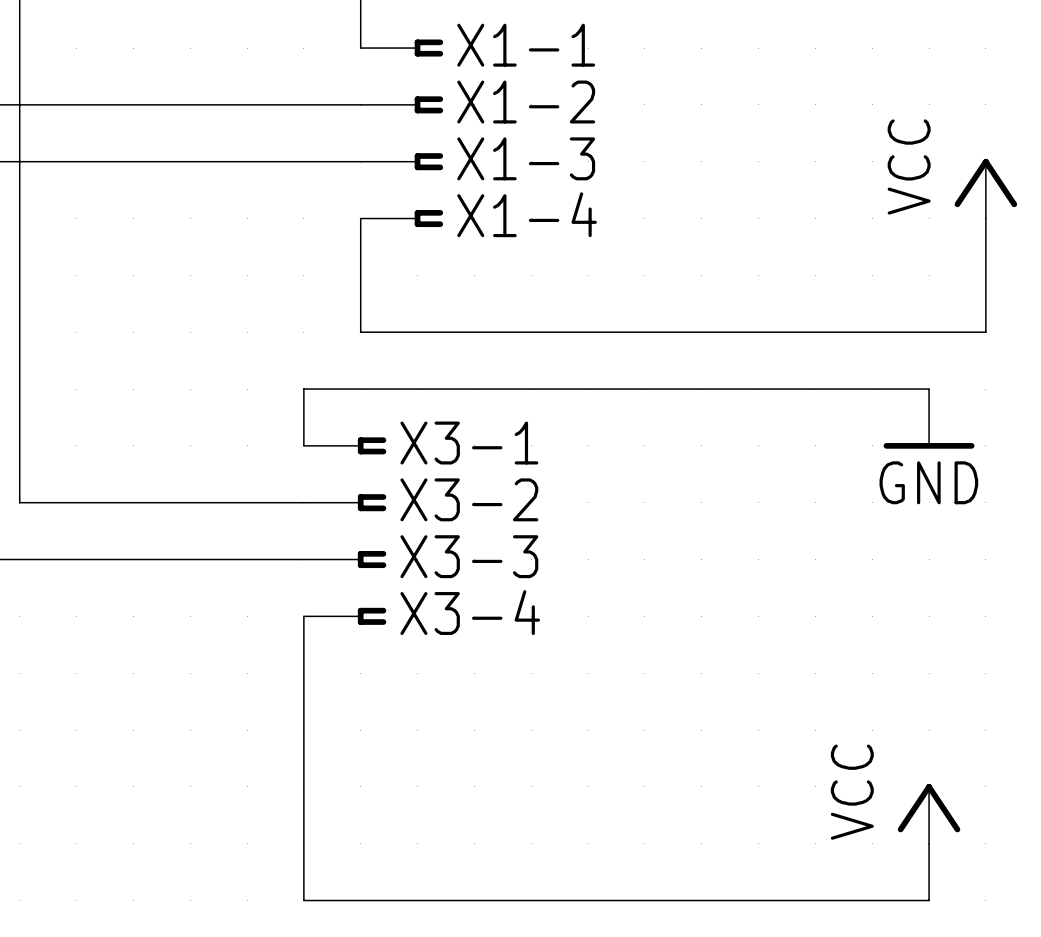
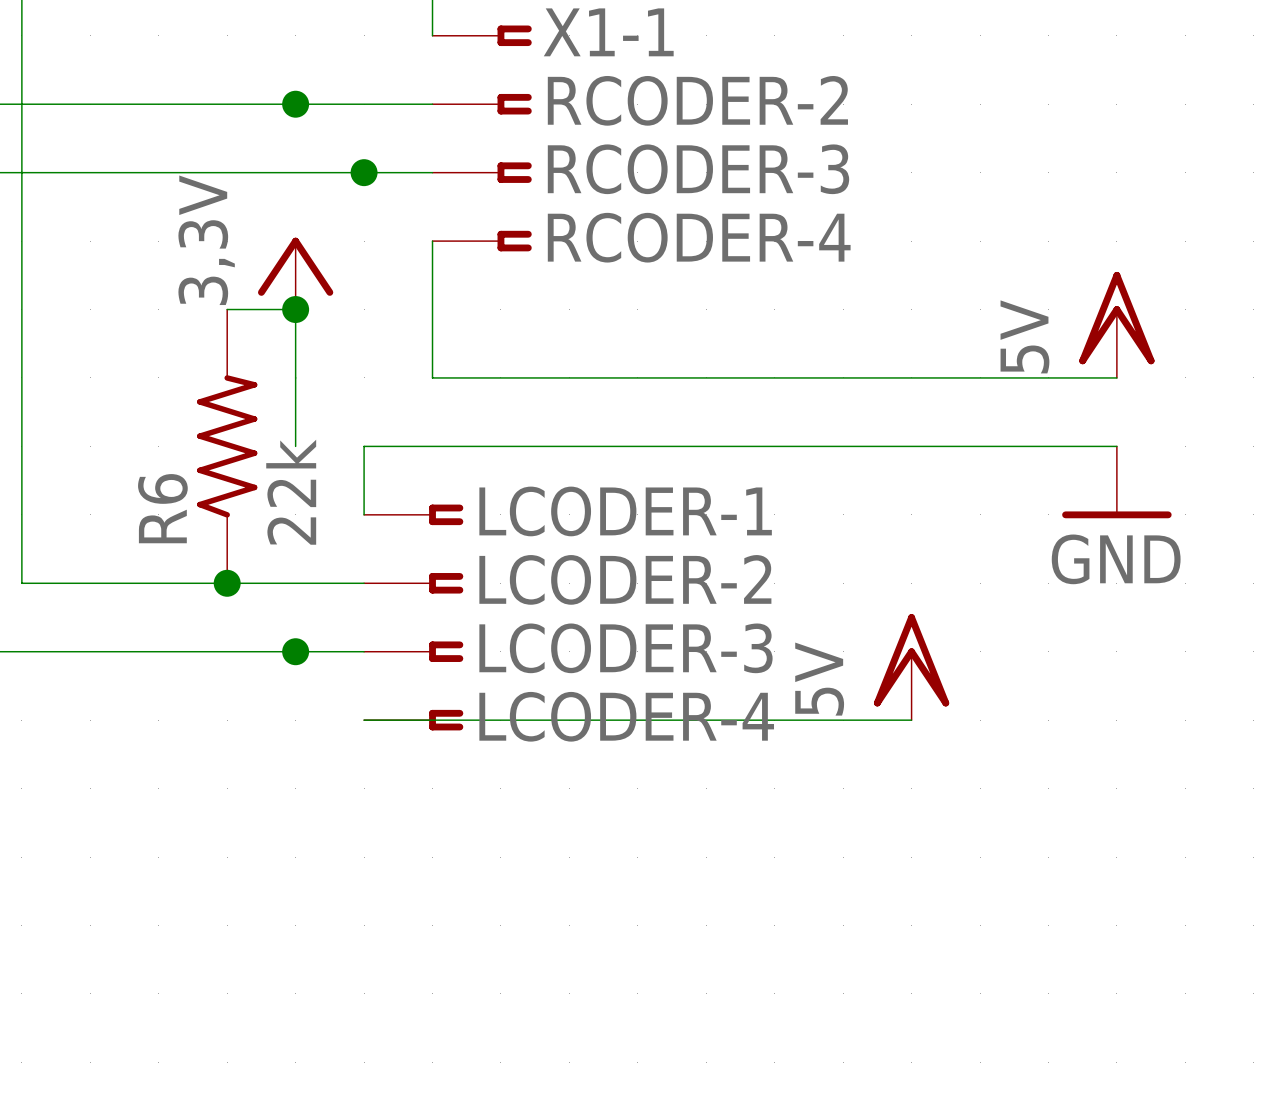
X1-2 name: X1-2 (526, 102) -> RCODER-2 (697, 100)
junction: none -> (295, 104)
X1-3 name: X1-3 (526, 158) -> RCODER-3 (698, 169)
junction: none -> (364, 172)
power symbol: VCC (985, 188) -> none
X1-4 name: X1-4 (527, 214) -> RCODER-4 (699, 237)
wire: (985, 218) (985, 332) (929, 332) -> none
power symbol: none -> 3,3V (295, 273)
wire: none -> (227, 309) (295, 309) (295, 446)
junction: none -> (295, 309)
power symbol: none -> 5V (1116, 324)
R6: none -> 22k (227, 446)
X3-1 name: X3-1 (469, 443) -> LCODER-1 (625, 511)
X3-2 name: X3-2 (469, 499) -> LCODER-2 (625, 579)
junction: none -> (227, 583)
X3-3 name: X3-3 (469, 556) -> LCODER-3 (625, 648)
junction: none -> (295, 651)
power symbol: none -> 5V (911, 667)
X3-4 name: X3-4 (470, 612) -> LCODER-4 (626, 716)
wire: (303, 616) (303, 900) (929, 900) (929, 843) -> (364, 720) (911, 720)
power symbol: VCC (929, 813) -> none

